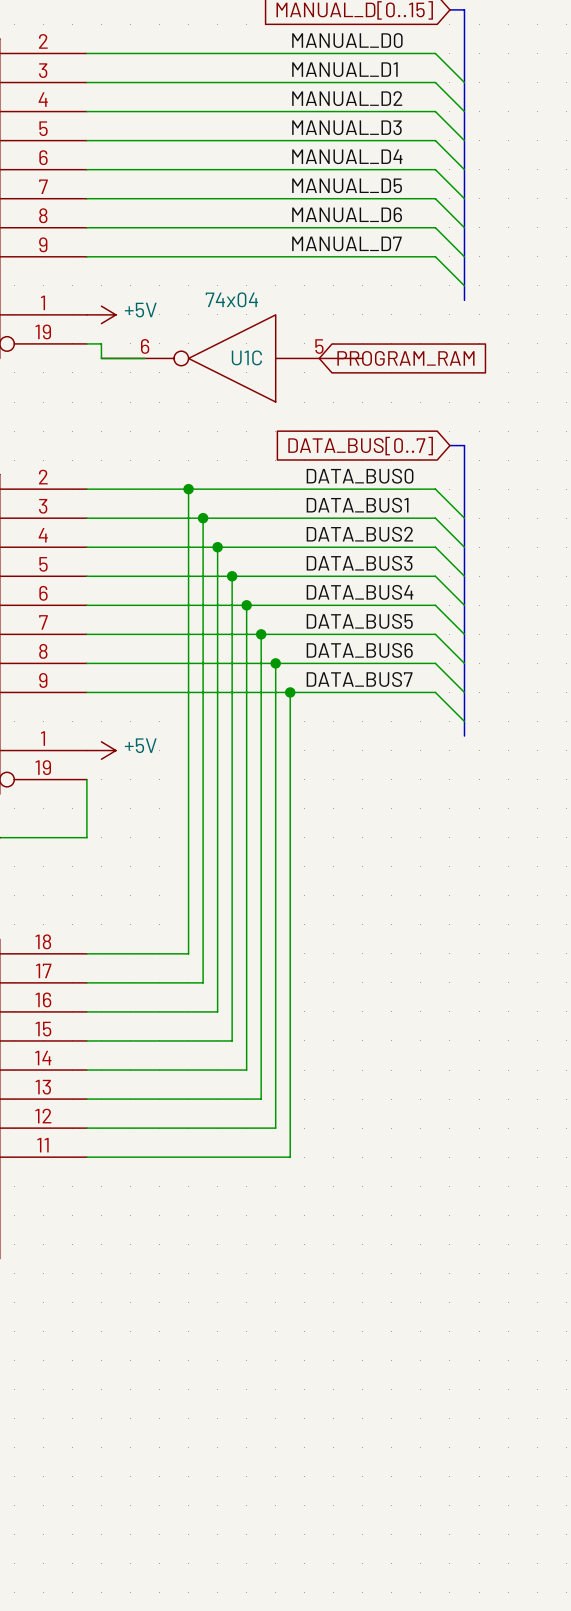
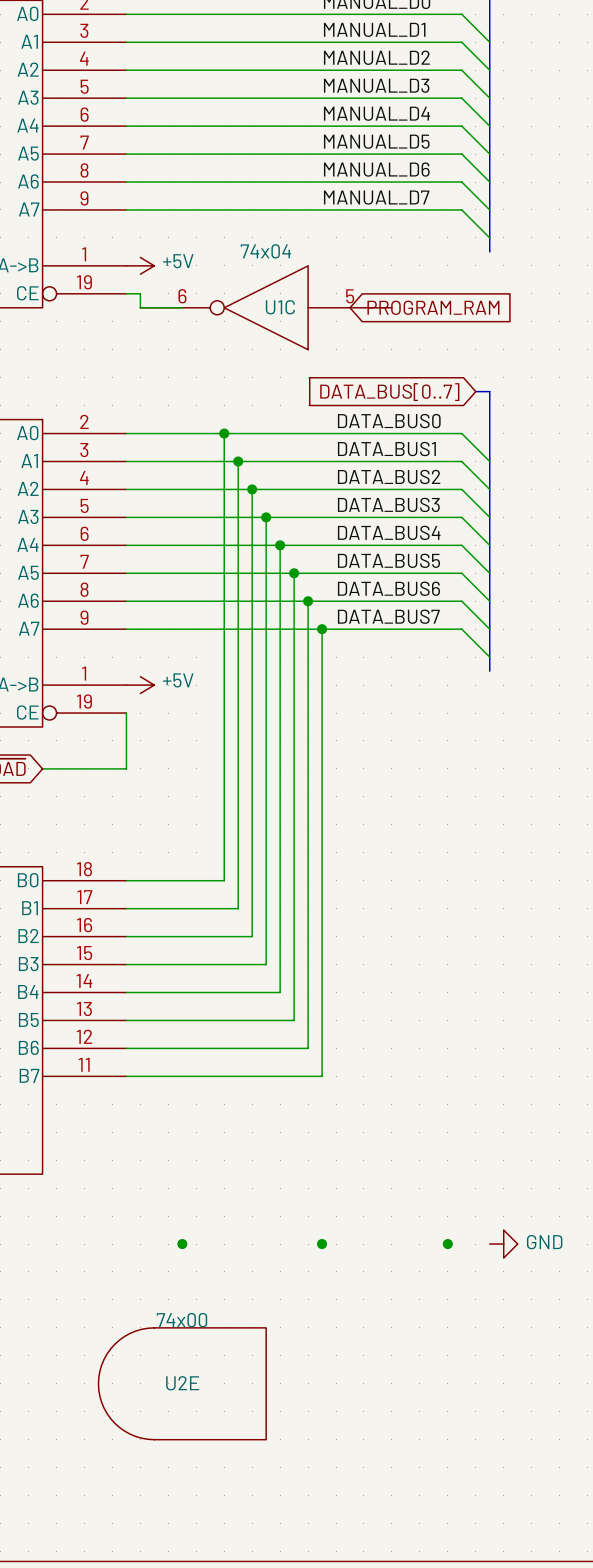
junction: none -> (182, 1244)
junction: none -> (322, 1244)
junction: none -> (447, 1244)
power symbol: none -> GND (503, 1244)
U2E: none -> 74x00 (182, 1383)

